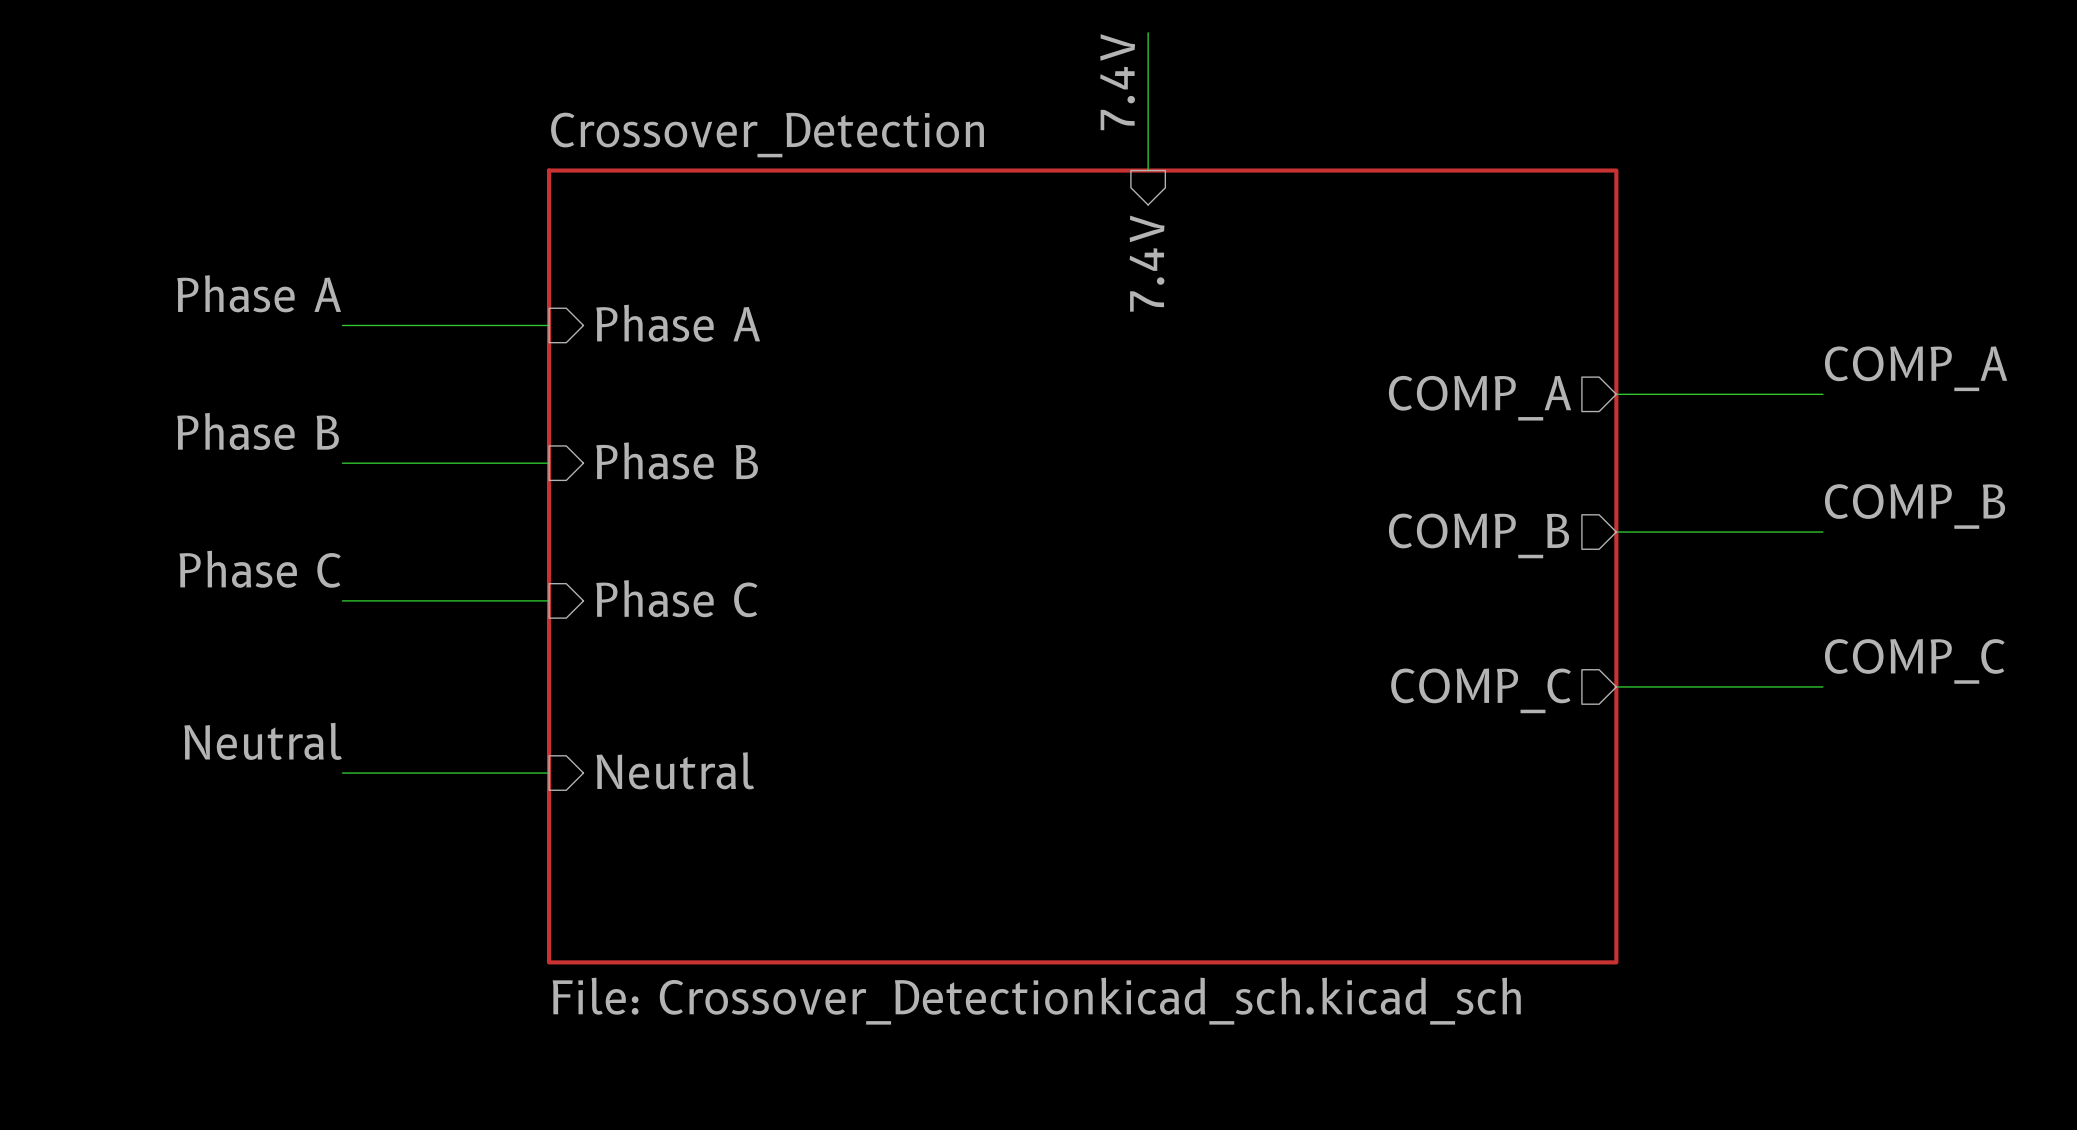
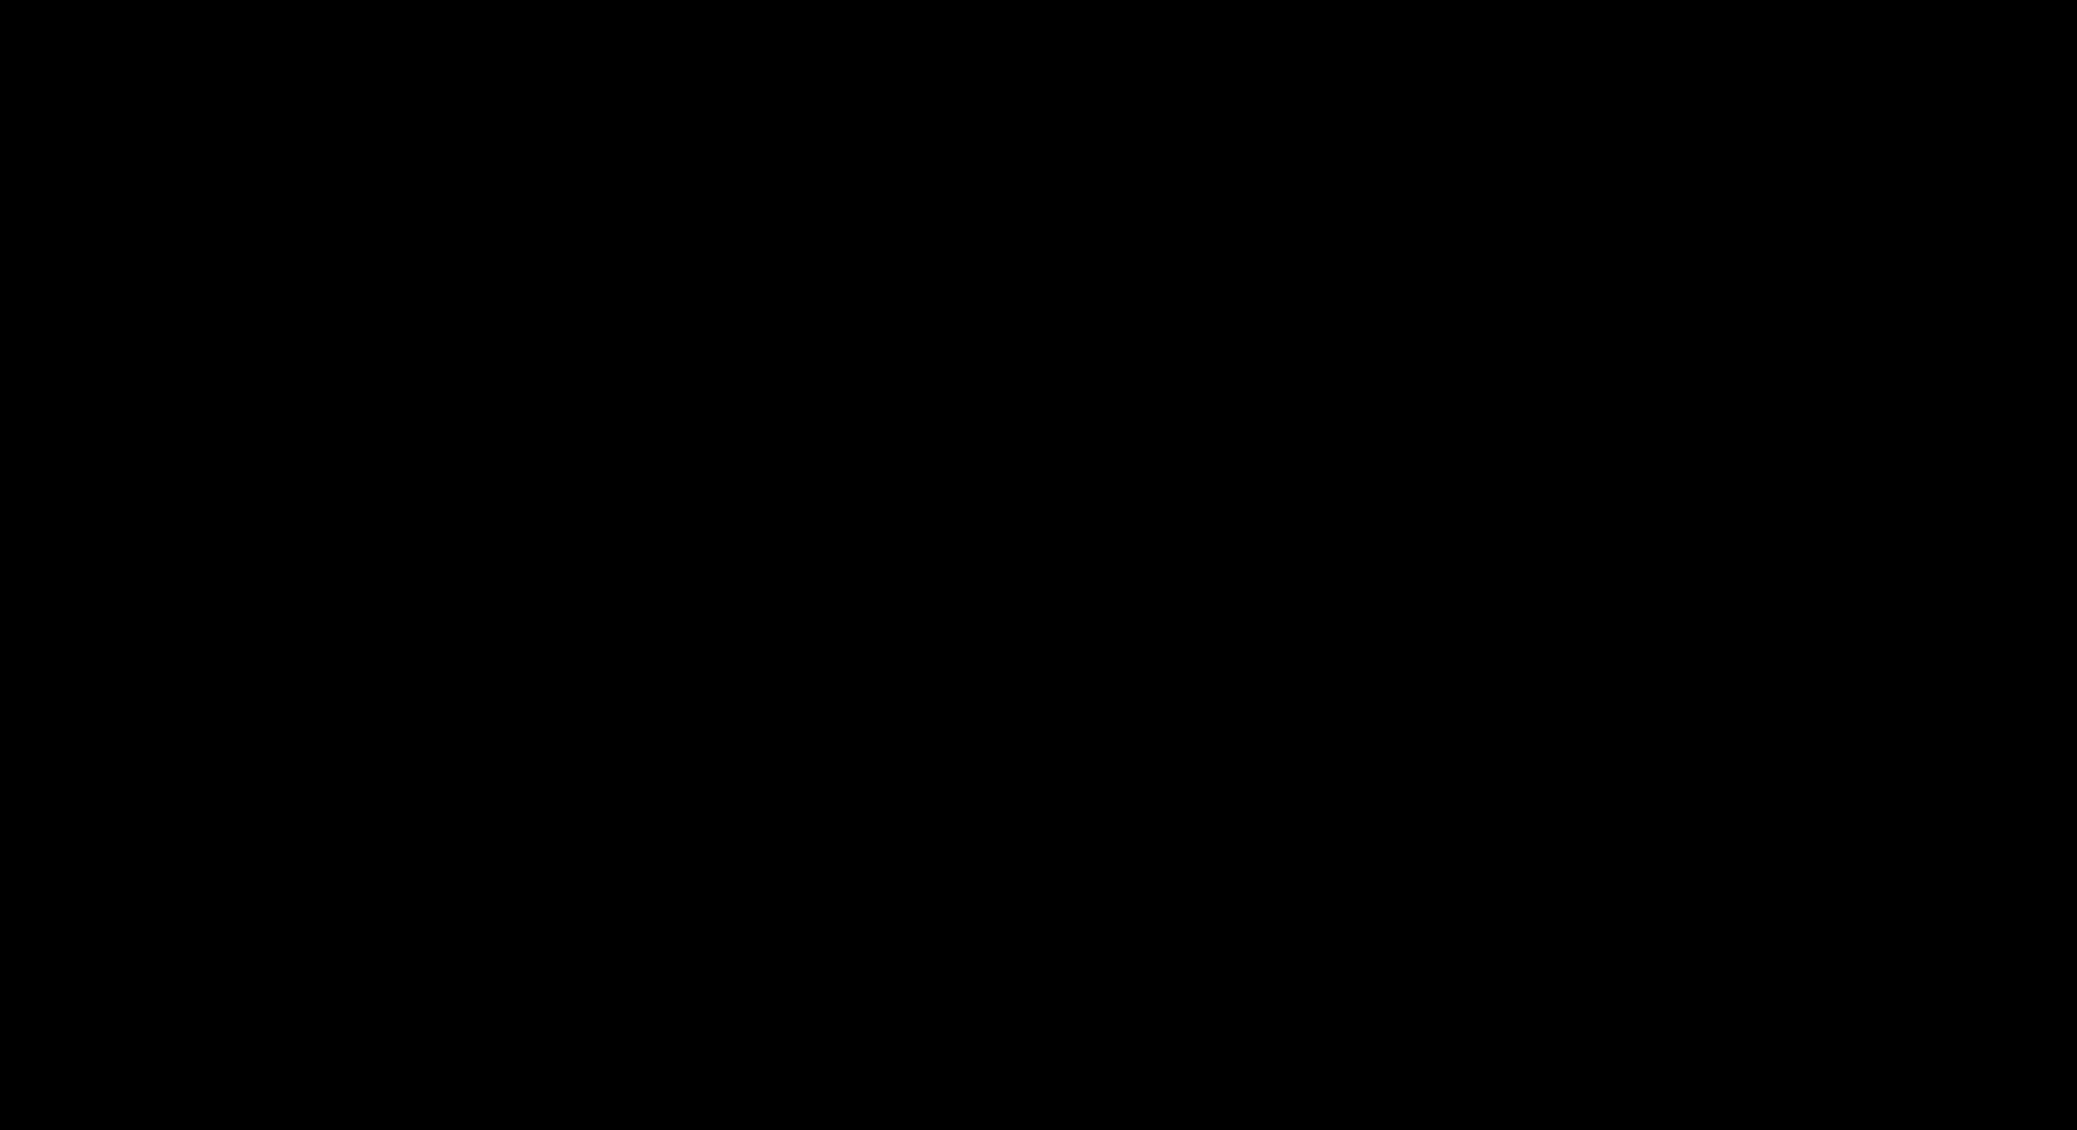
wire: (1148, 32) (1148, 170) -> none
label: 7.4V (1117, 82) -> none
sheet pin: 7.4V (1147, 263) -> none
label: Phase A (259, 293) -> none
sheet pin: Phase A (678, 323) -> none
wire: (342, 325) (549, 325) -> none
label: COMP_A (1916, 368) -> none
wire: (1616, 394) (1822, 394) -> none
sheet pin: COMP_A (1480, 398) -> none
label: Phase B (258, 431) -> none
sheet pin: Phase B (677, 460) -> none
wire: (342, 463) (549, 463) -> none
label: COMP_B (1915, 506) -> none
wire: (1616, 532) (1822, 532) -> none
sheet pin: COMP_B (1478, 535) -> none
sheet Crossover_Detection: File: Crossover_Detectionkicad_sch.kicad_sch (1082, 566) -> none
label: Phase C (260, 569) -> none
sheet pin: Phase C (676, 598) -> none
wire: (342, 600) (549, 600) -> none
label: COMP_C (1914, 661) -> none
wire: (1616, 686) (1822, 686) -> none
sheet pin: COMP_C (1481, 690) -> none
label: Neutral (263, 741) -> none
sheet pin: Neutral (675, 770) -> none
wire: (342, 773) (549, 773) -> none

